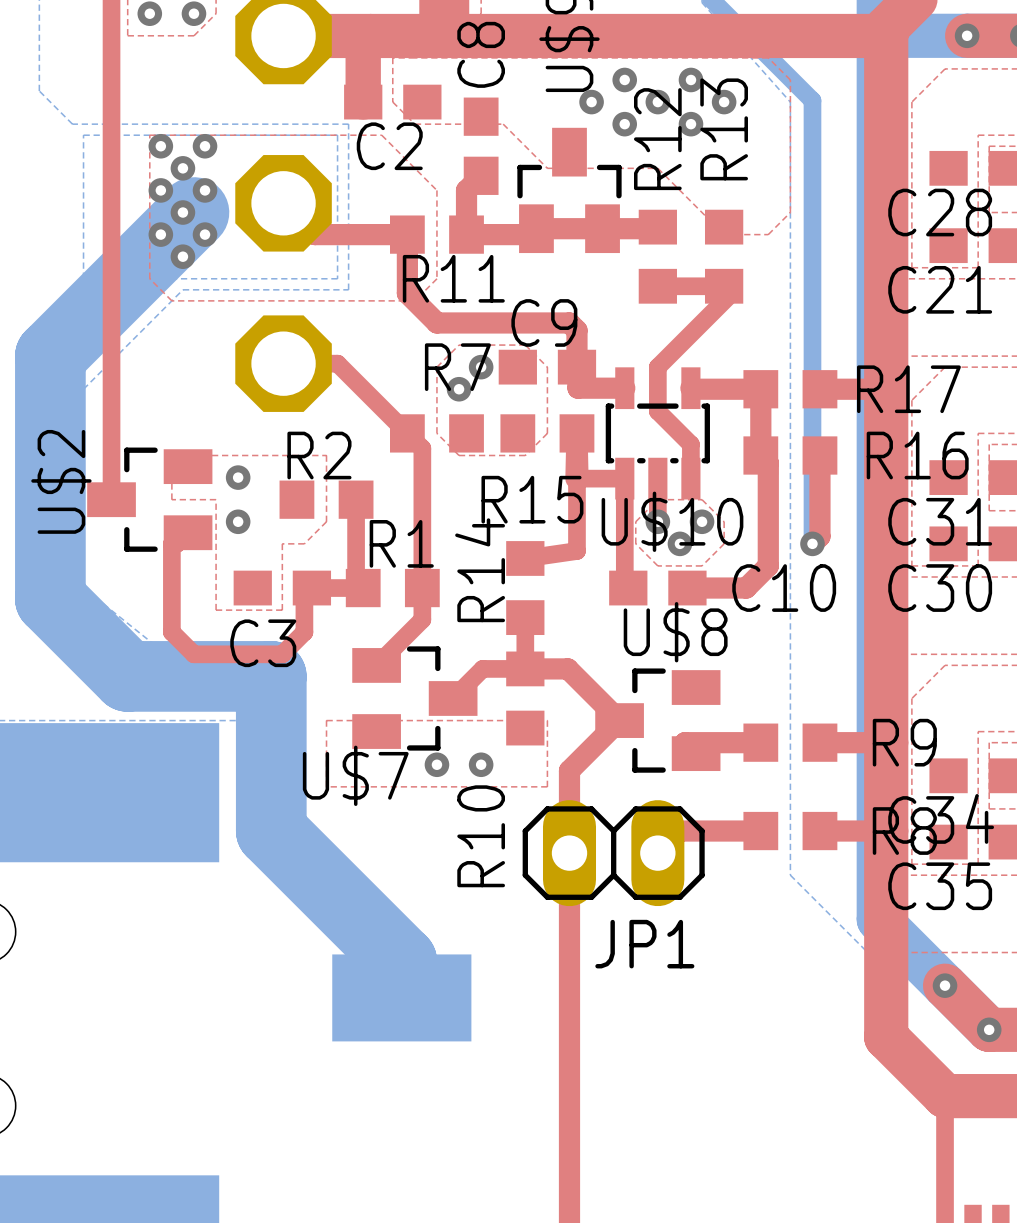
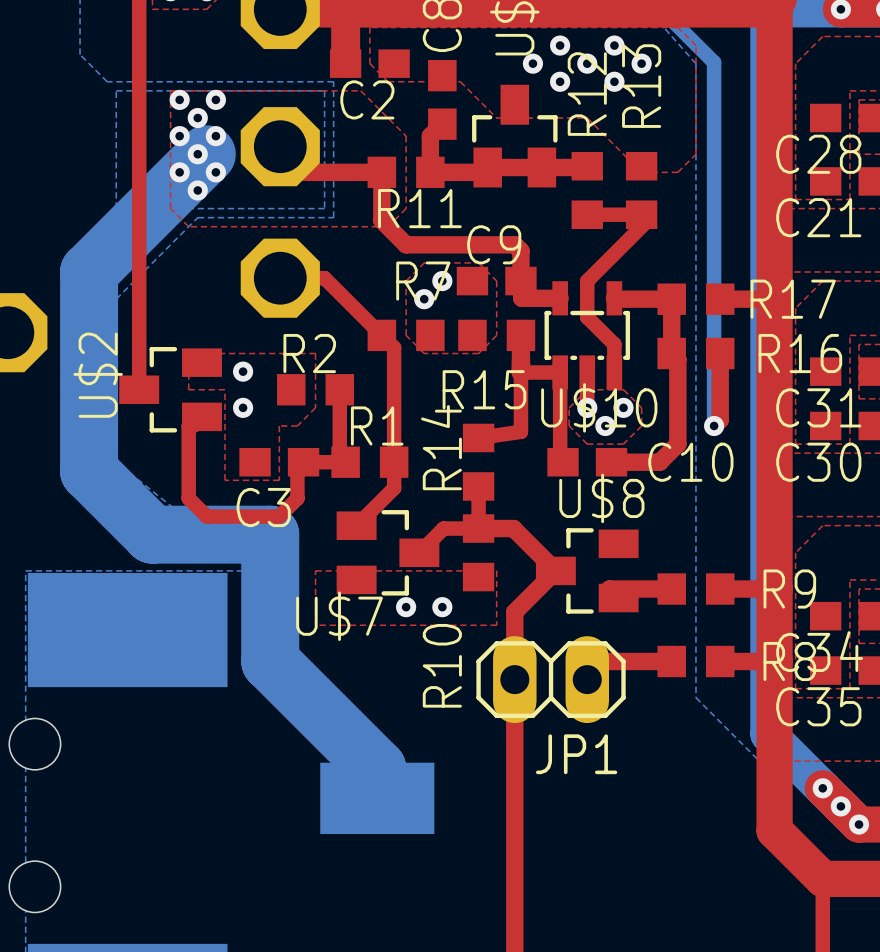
via: none -> (840, 806)

